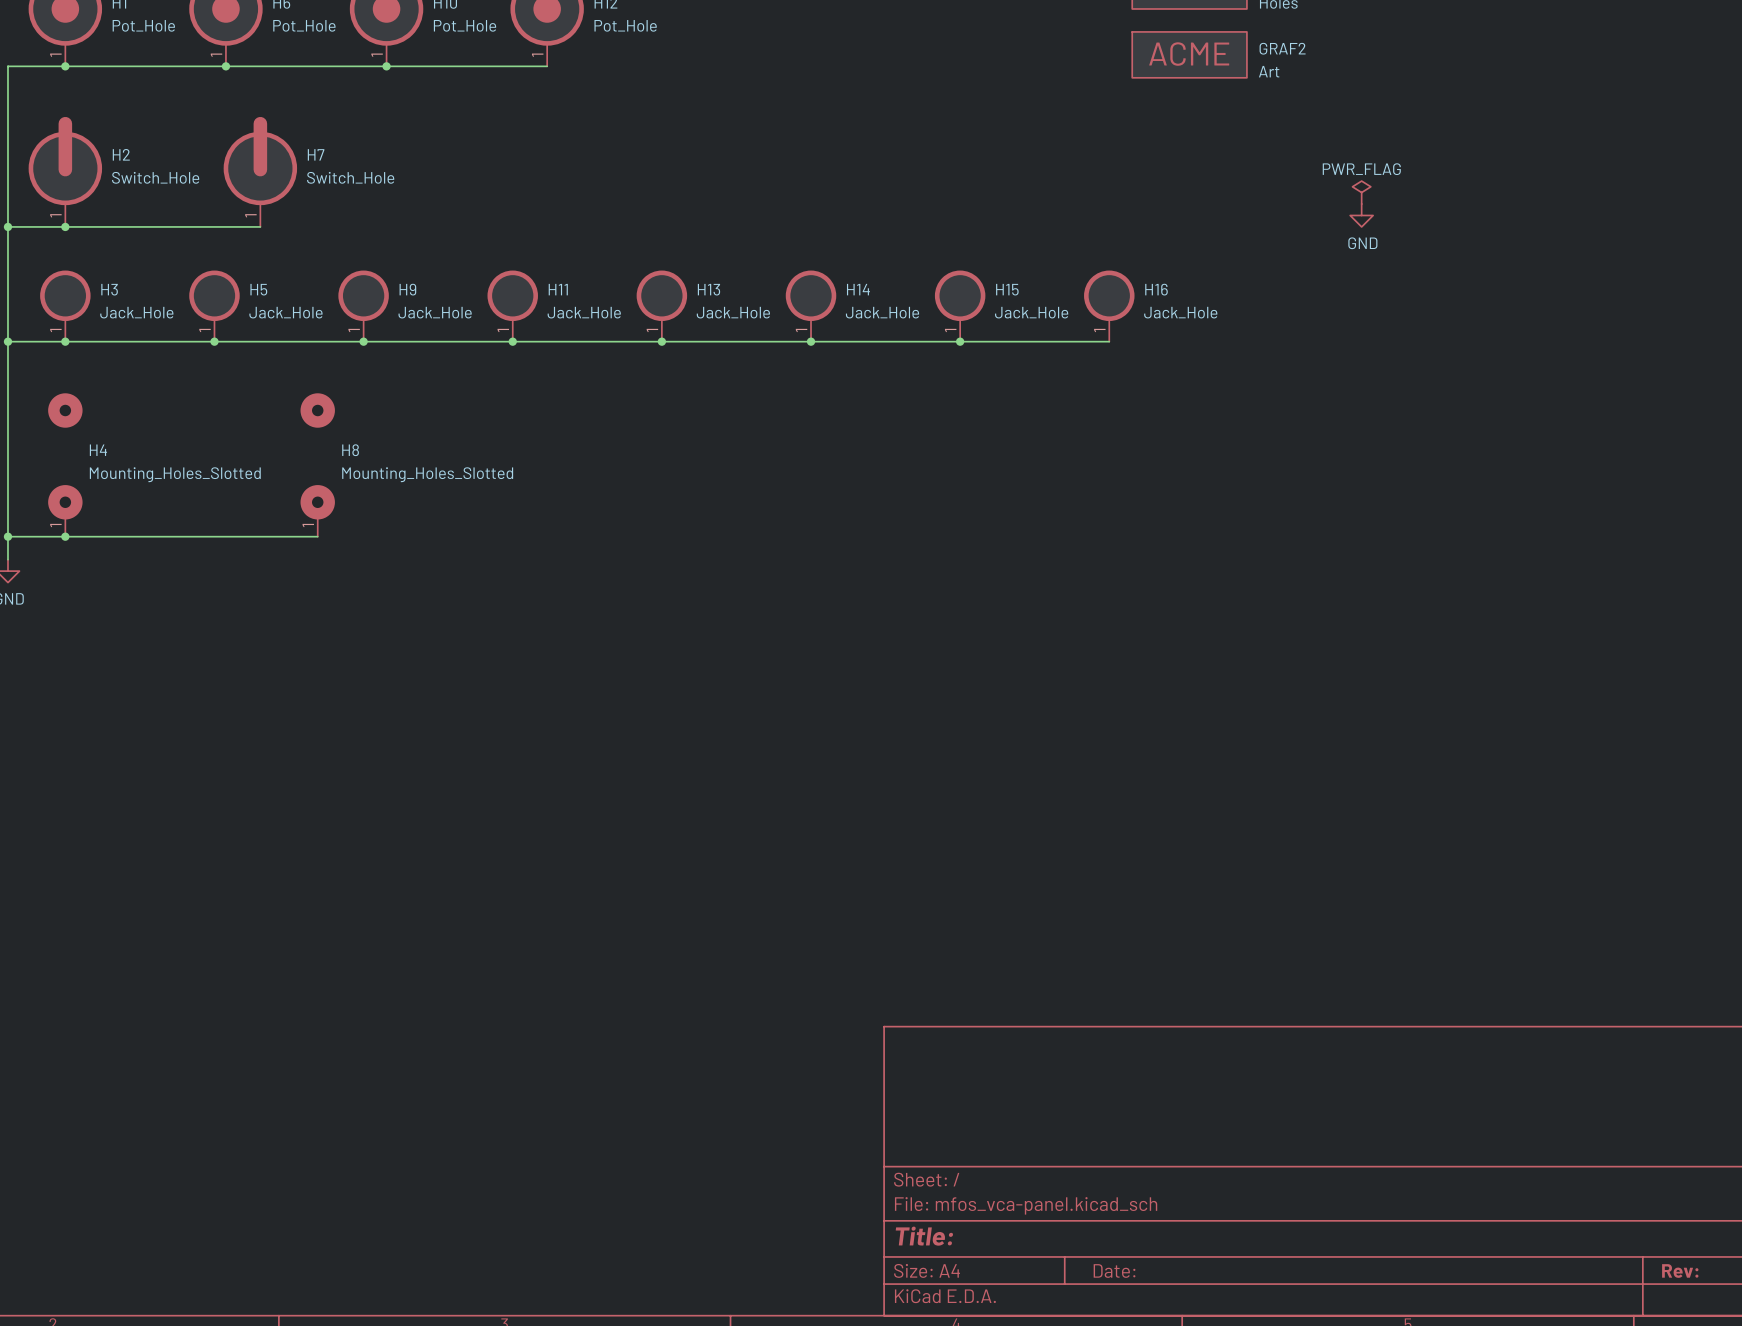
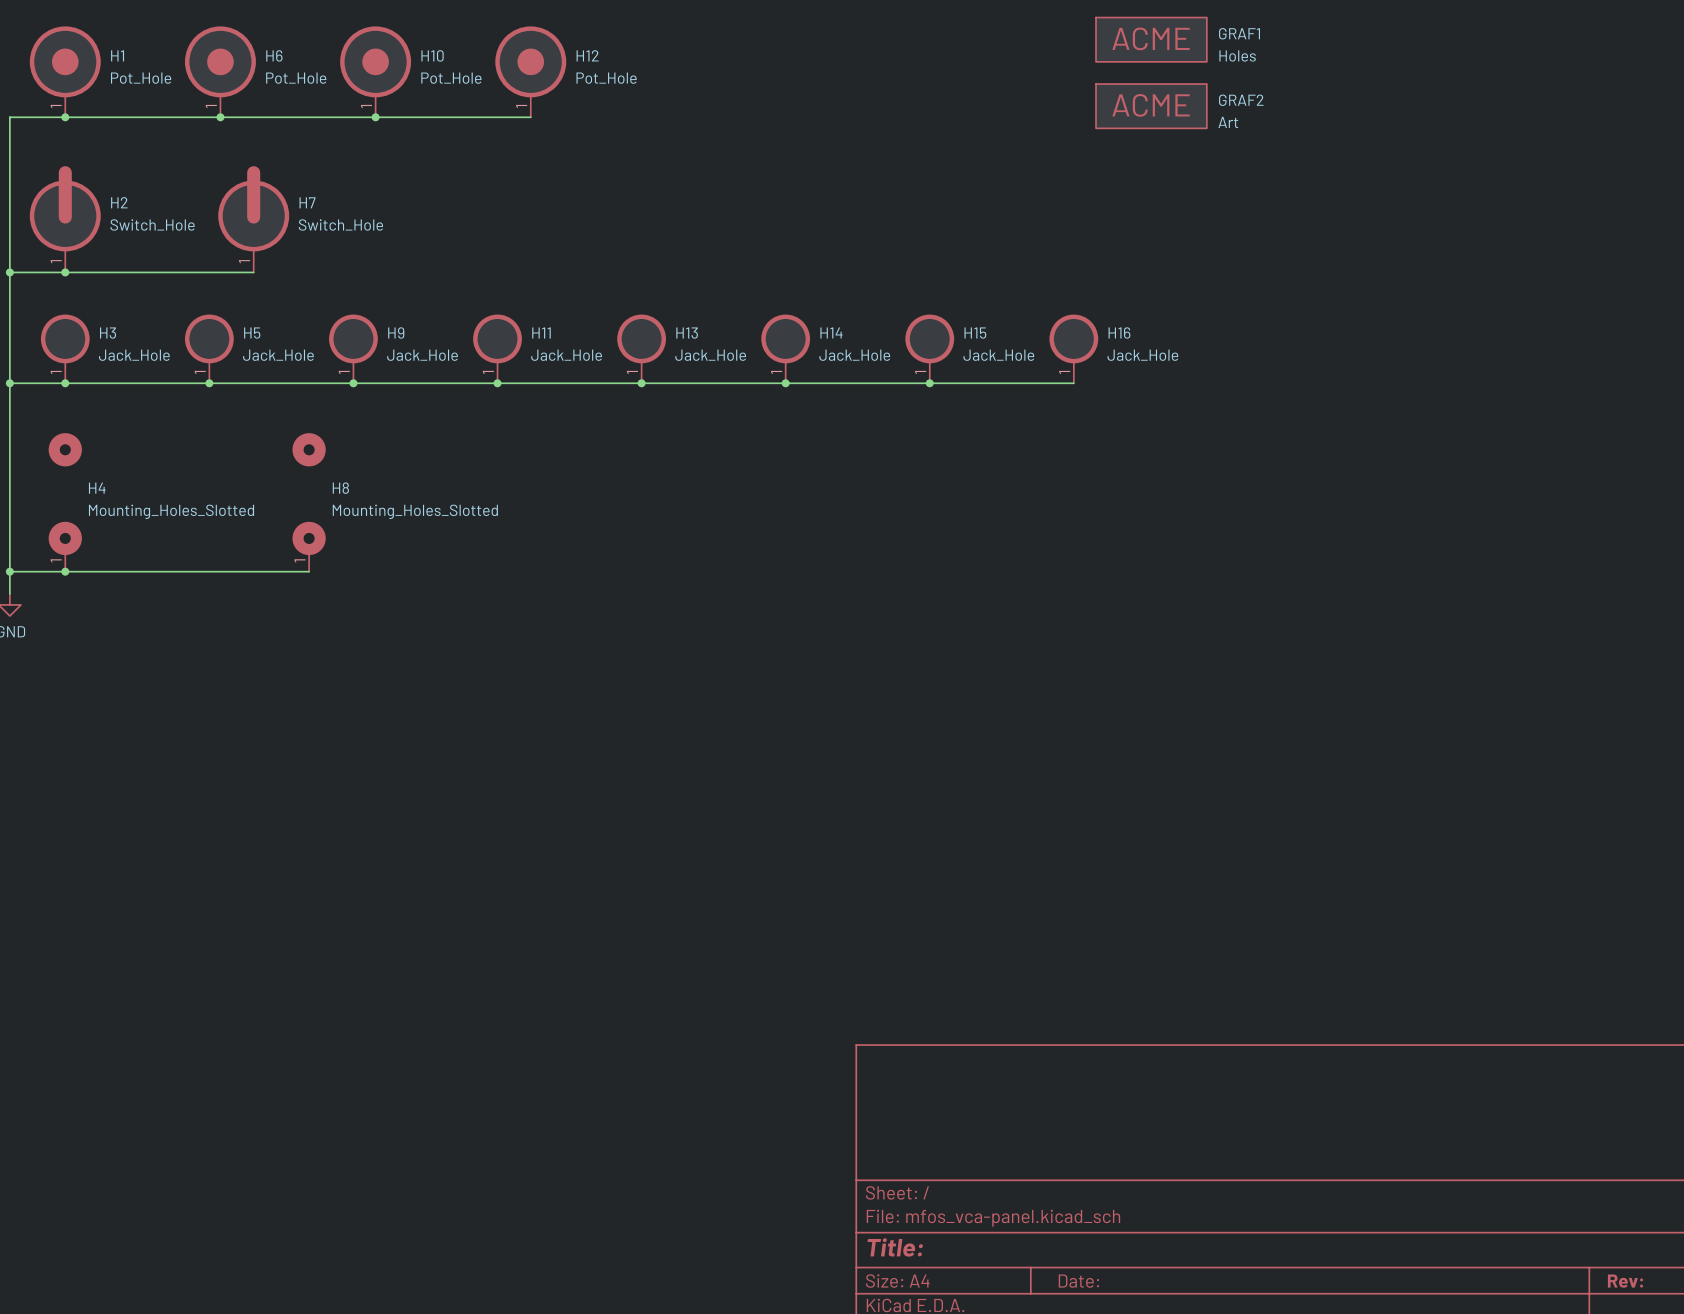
power symbol: PWR_FLAG (1361, 192) -> none
power symbol: GND (1361, 215) -> none

